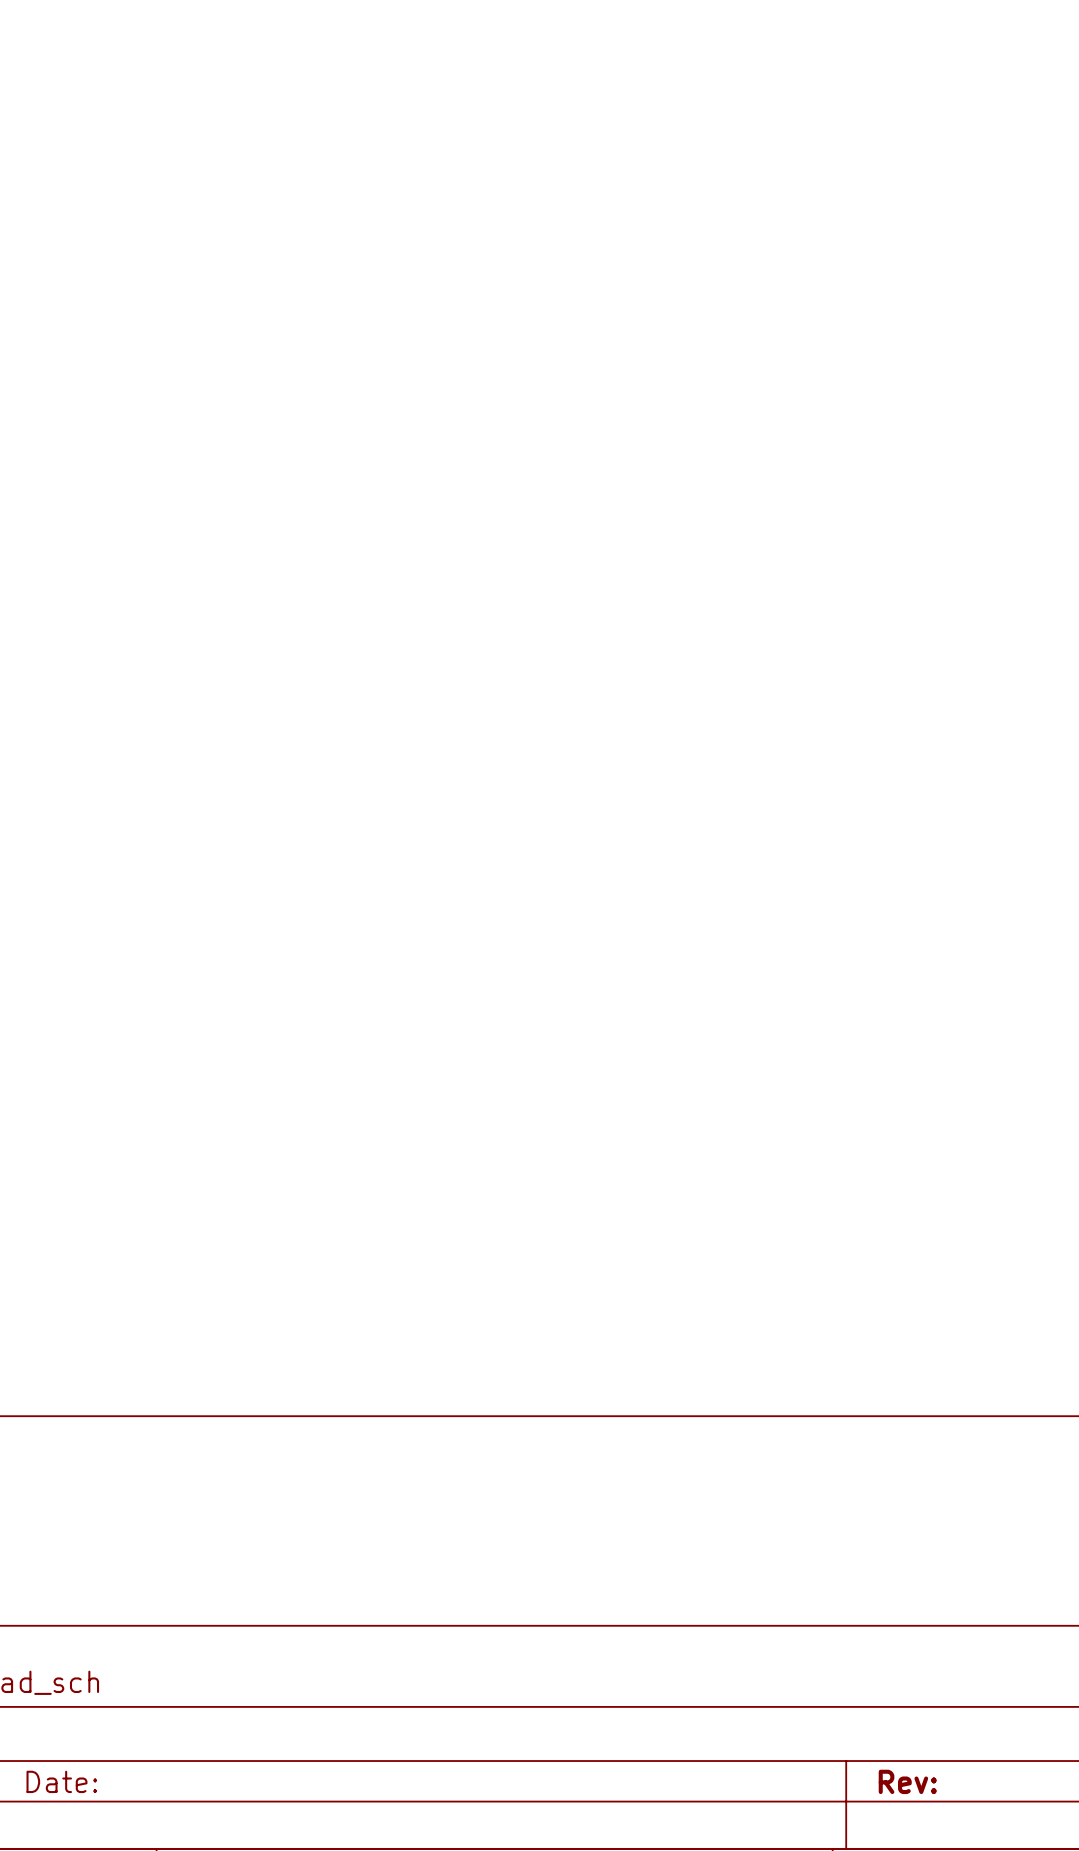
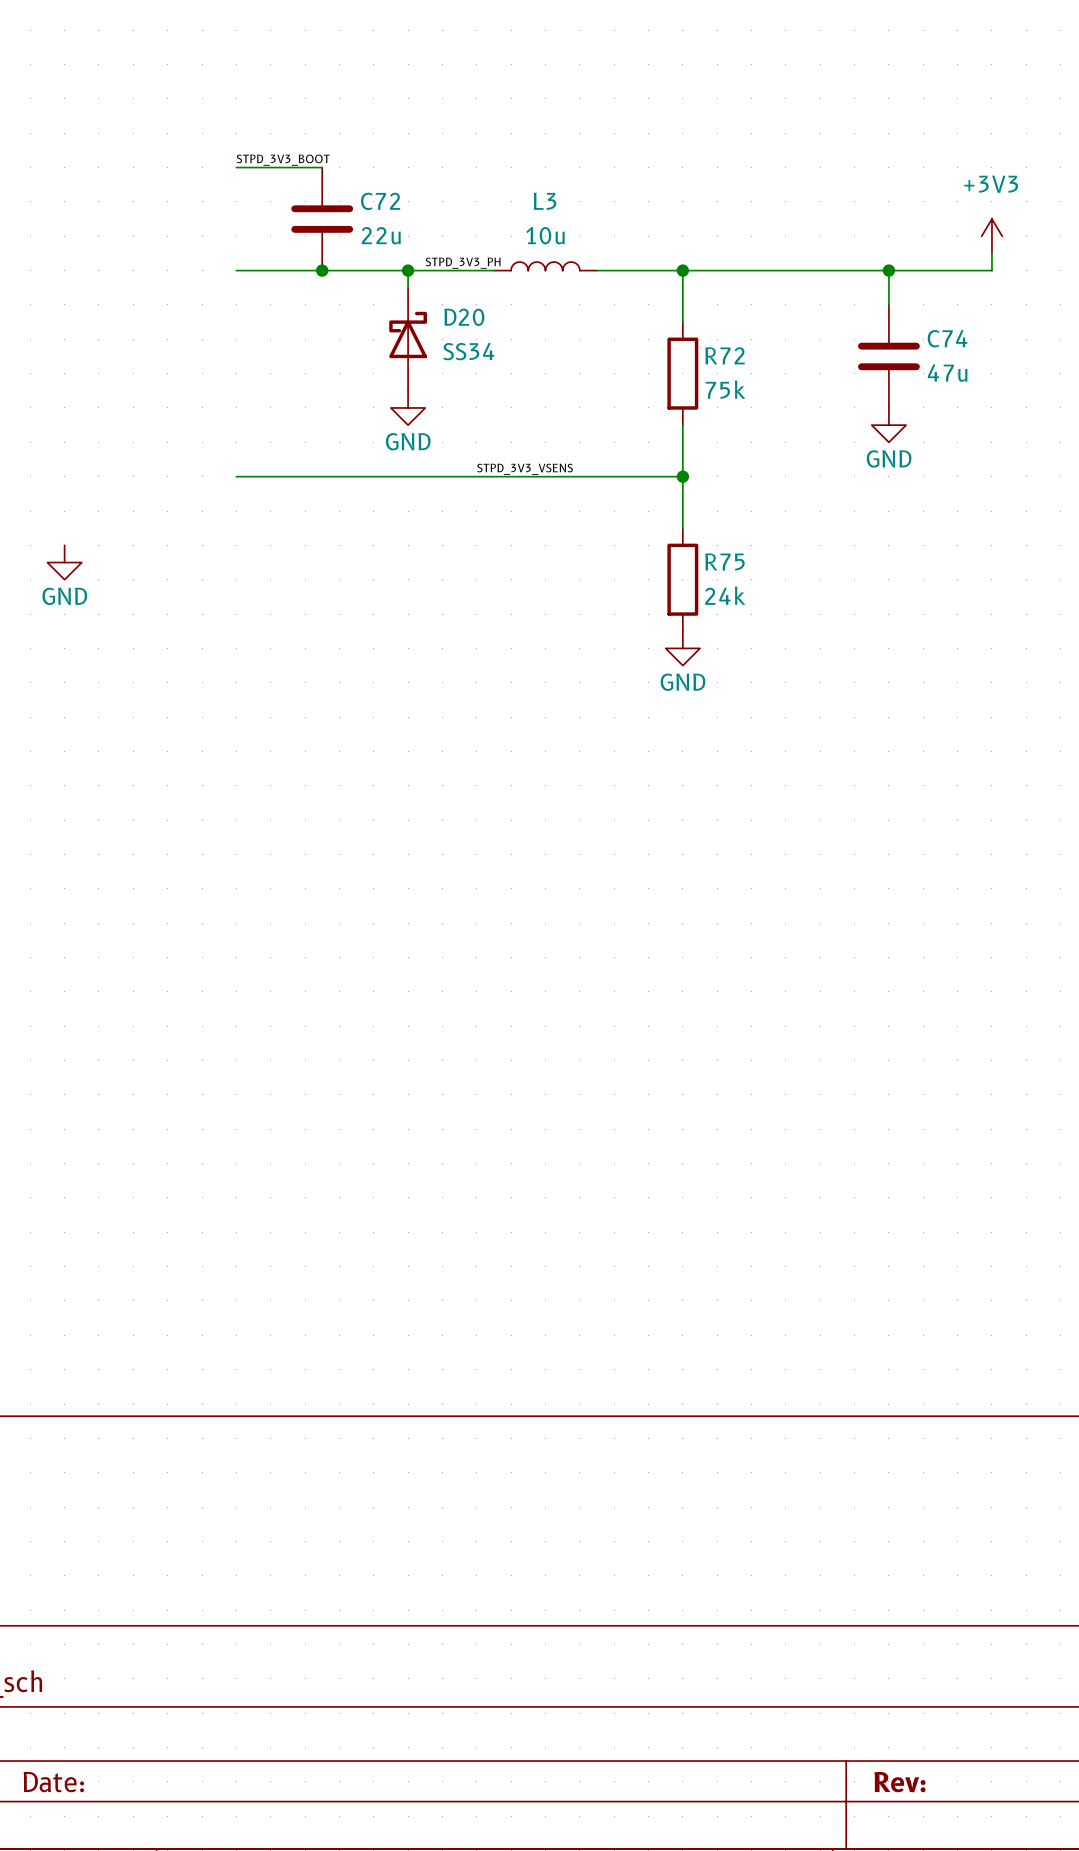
label: none -> STPD_3V3_BOOT (283, 160)
wire: none -> (236, 167) (322, 167)
C72: none -> 22u (322, 219)
power symbol: none -> +3V3 (991, 236)
wire: none -> (991, 253) (991, 270) (596, 270)
label: none -> STPD_3V3_PH (463, 263)
L3: none -> 10u (545, 266)
wire: none -> (236, 270) (493, 270)
junction: none -> (322, 270)
wire: none -> (408, 270) (408, 287)
junction: none -> (408, 270)
wire: none -> (682, 270) (682, 322)
junction: none -> (682, 270)
wire: none -> (888, 270) (888, 304)
junction: none -> (888, 270)
D20: none -> SS34 (408, 339)
C74: none -> 47u (888, 356)
R72: none -> 75k (682, 373)
power symbol: none -> GND (408, 407)
wire: none -> (682, 425) (682, 528)
power symbol: none -> GND (888, 425)
label: none -> STPD_3V3_VSENS (525, 469)
wire: none -> (236, 476) (682, 476)
junction: none -> (682, 476)
power symbol: none -> GND (64, 562)
R75: none -> 24k (682, 579)
power symbol: none -> GND (682, 648)

